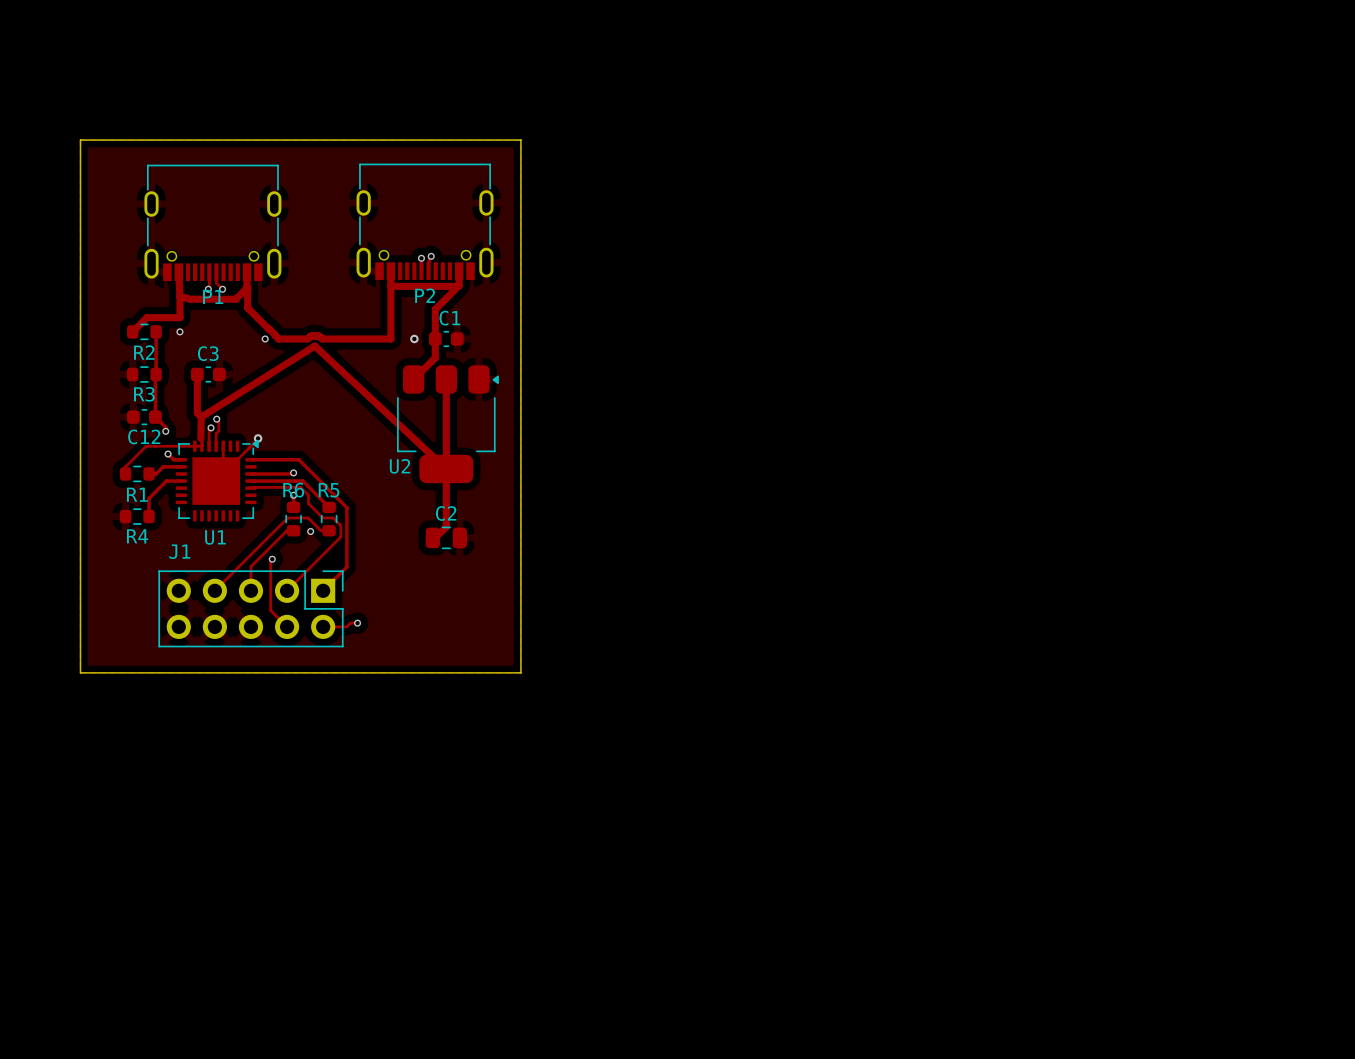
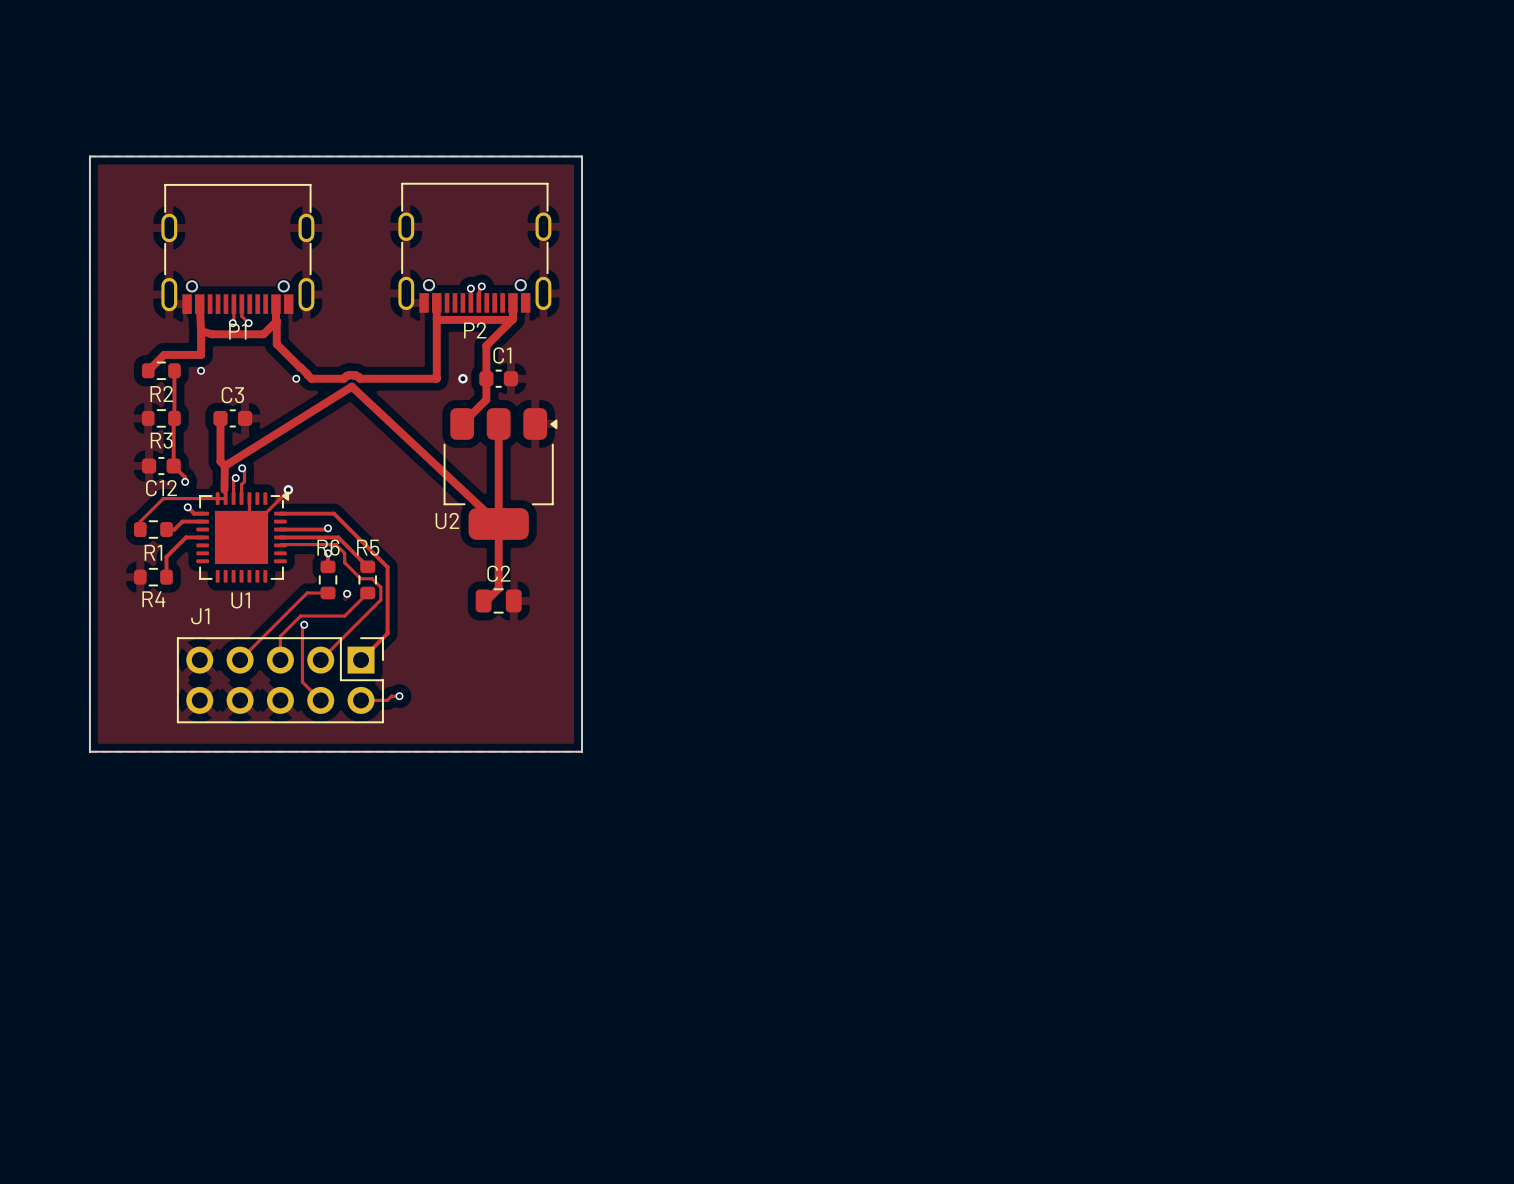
track: (274, 530) (287, 518) (308, 518) (321, 530) (329, 530) -> (307, 593) (320, 593)
track: (286, 530) (250, 566) (250, 569) -> (367, 593) (344, 616) (300, 616) (280, 636)

